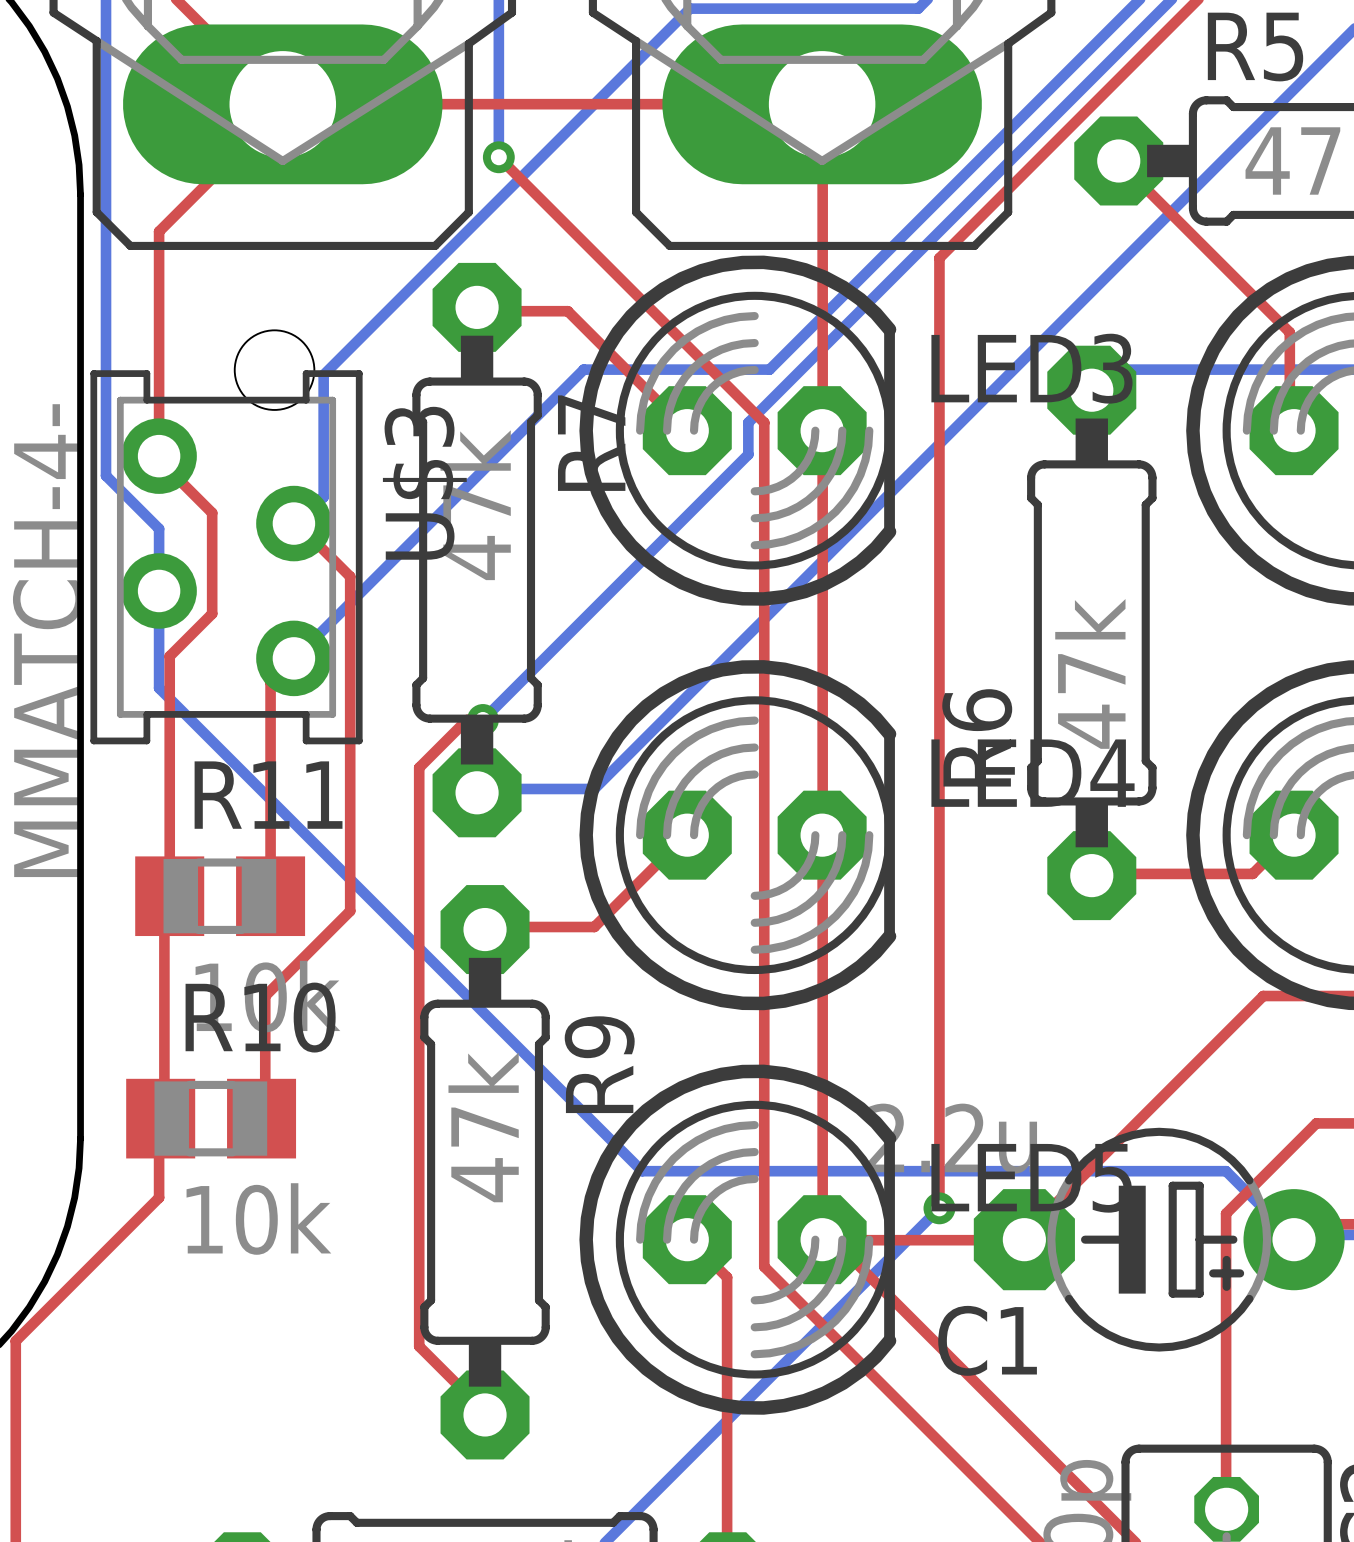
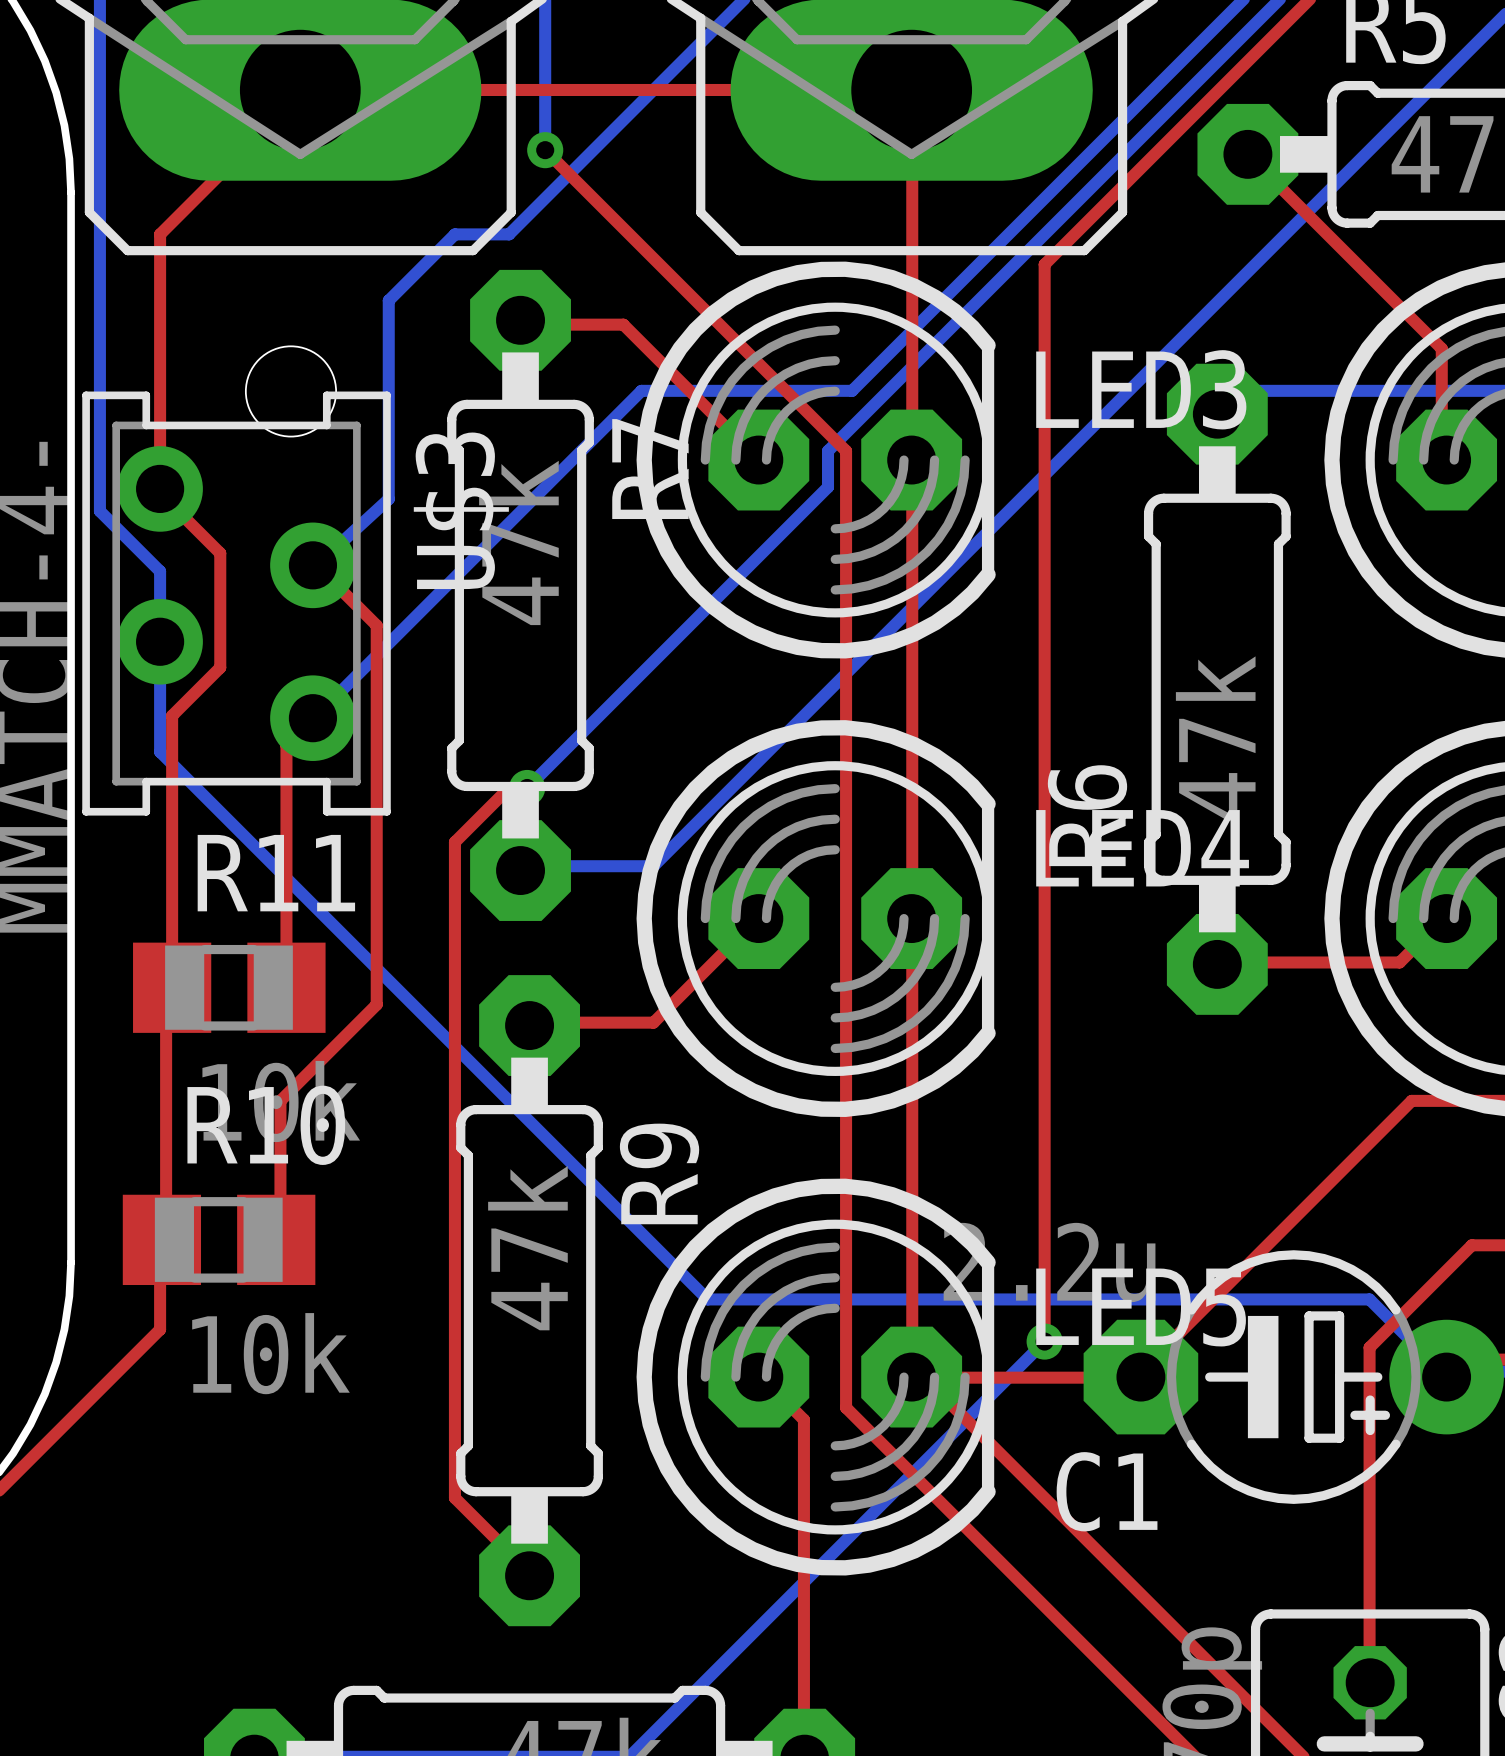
bottom track: (466, 231) (323, 374) (323, 497) (297, 523) -> (509, 234) (454, 234) (388, 300) (388, 499) (316, 565)

